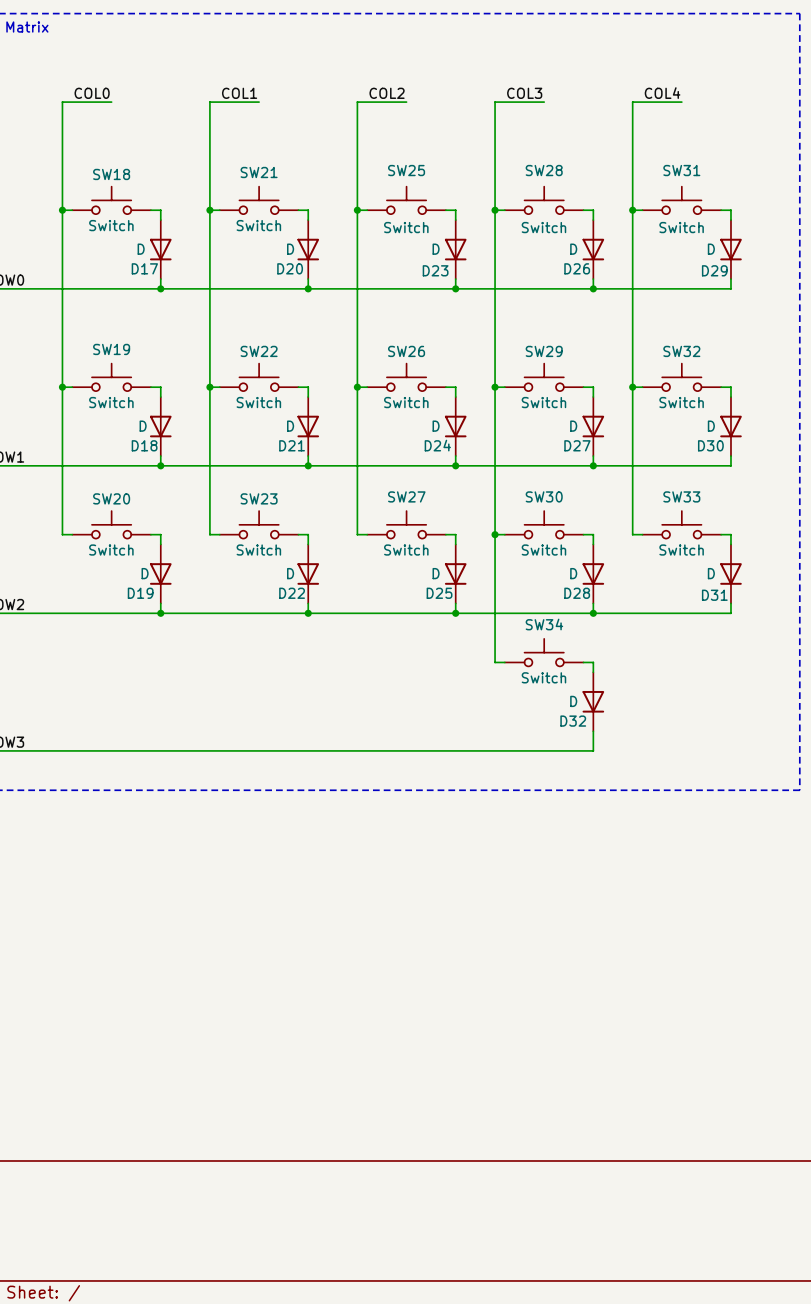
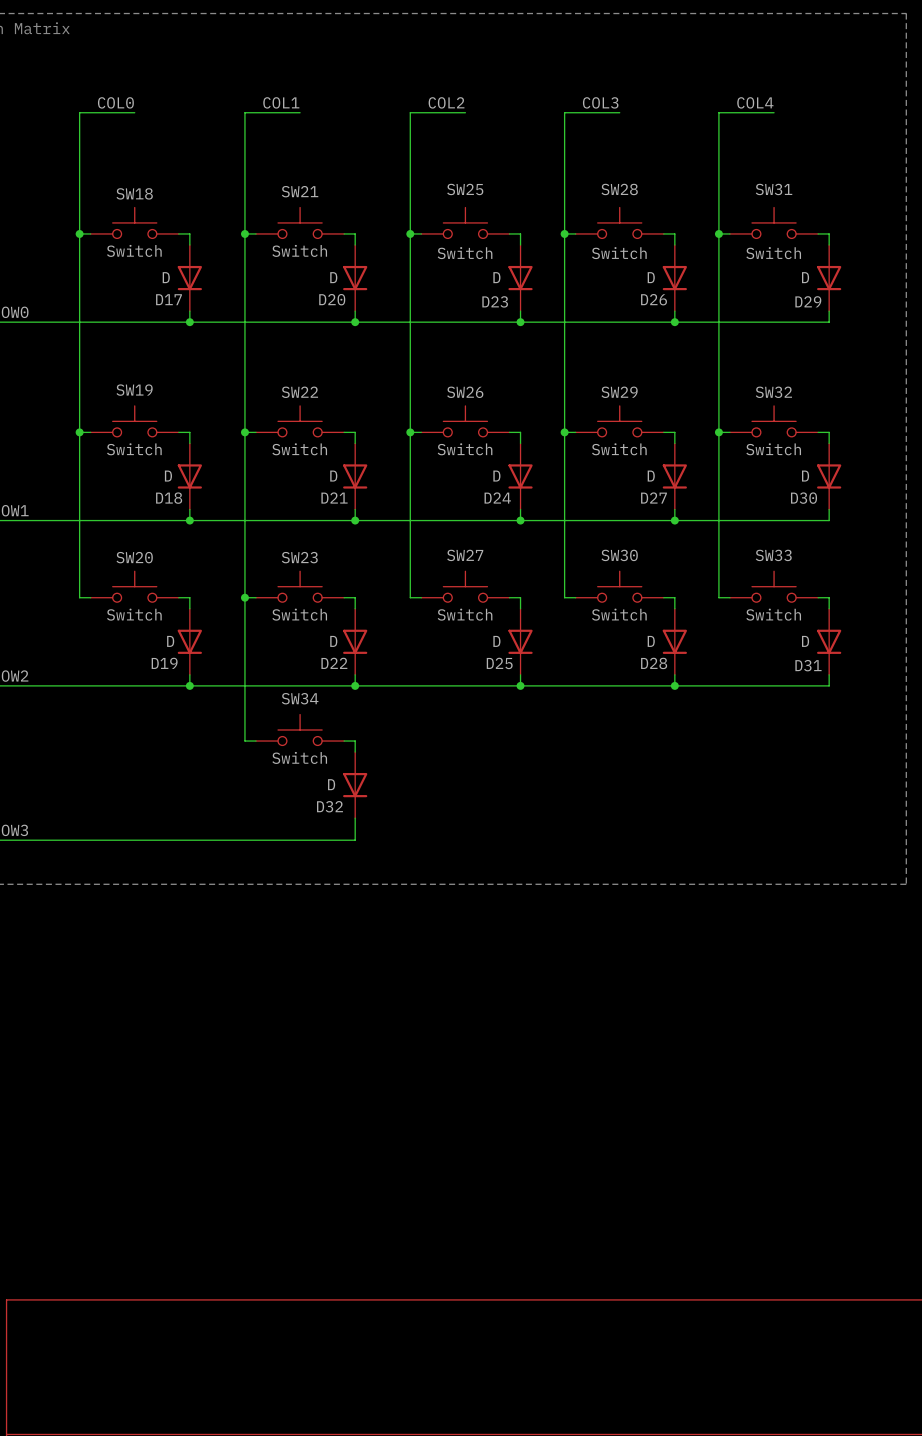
wire: none -> (244, 597) (244, 741) (255, 741)
junction: none -> (244, 597)
wire: (495, 534) (495, 662) (504, 662) -> none
junction: (495, 534) -> none
SW34 position: (544, 652) -> (300, 729)
wire: none -> (344, 741) (355, 741) (355, 752)
wire: (583, 662) (593, 662) (593, 672) -> none
D32 position: (593, 701) -> (355, 785)
wire: (593, 731) (593, 750) (308, 750) -> (355, 818) (355, 840)

